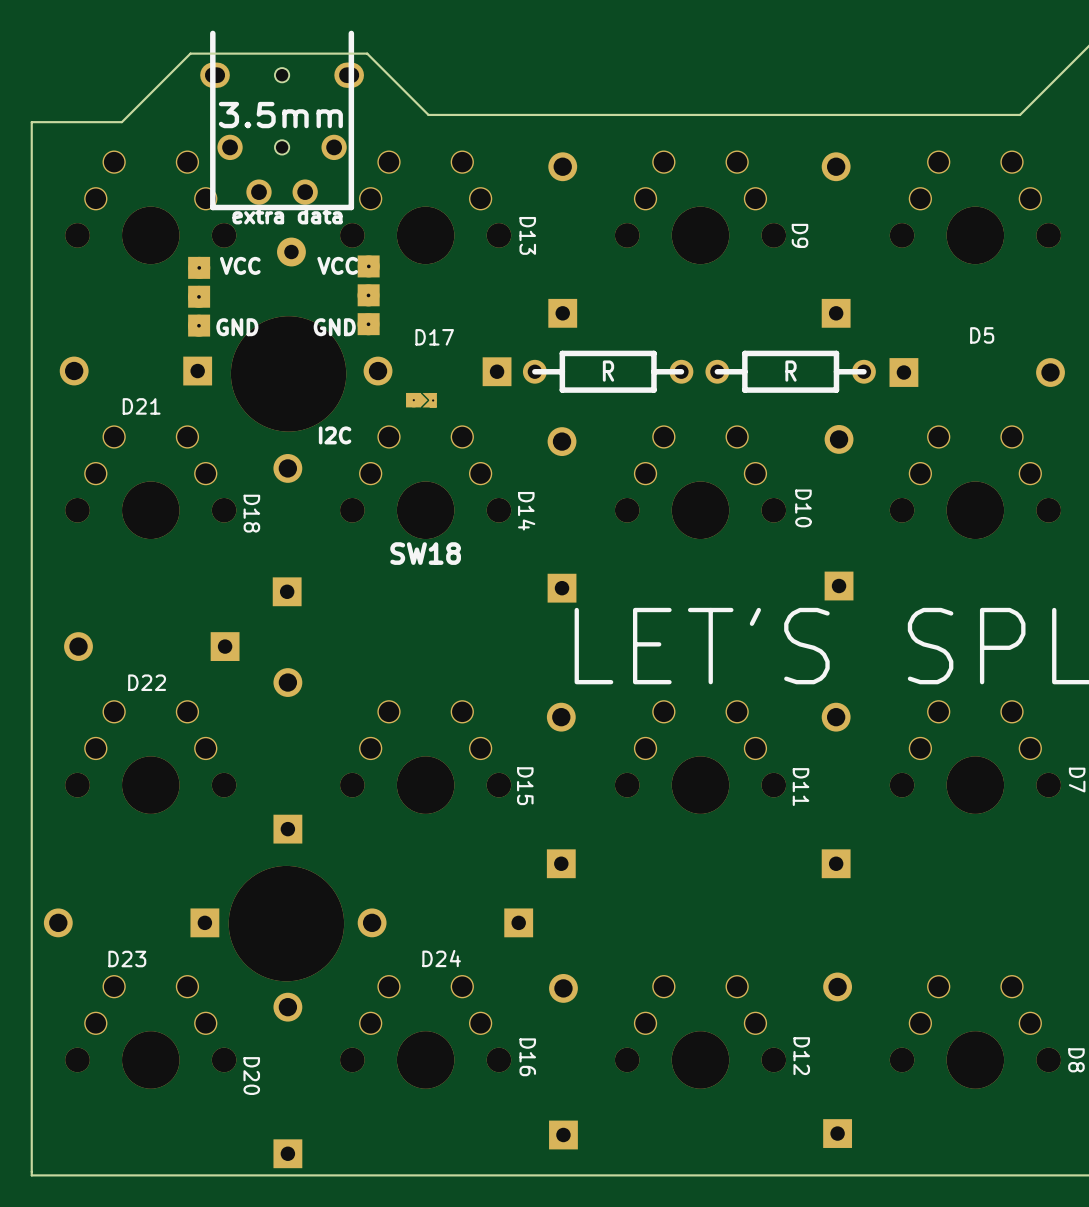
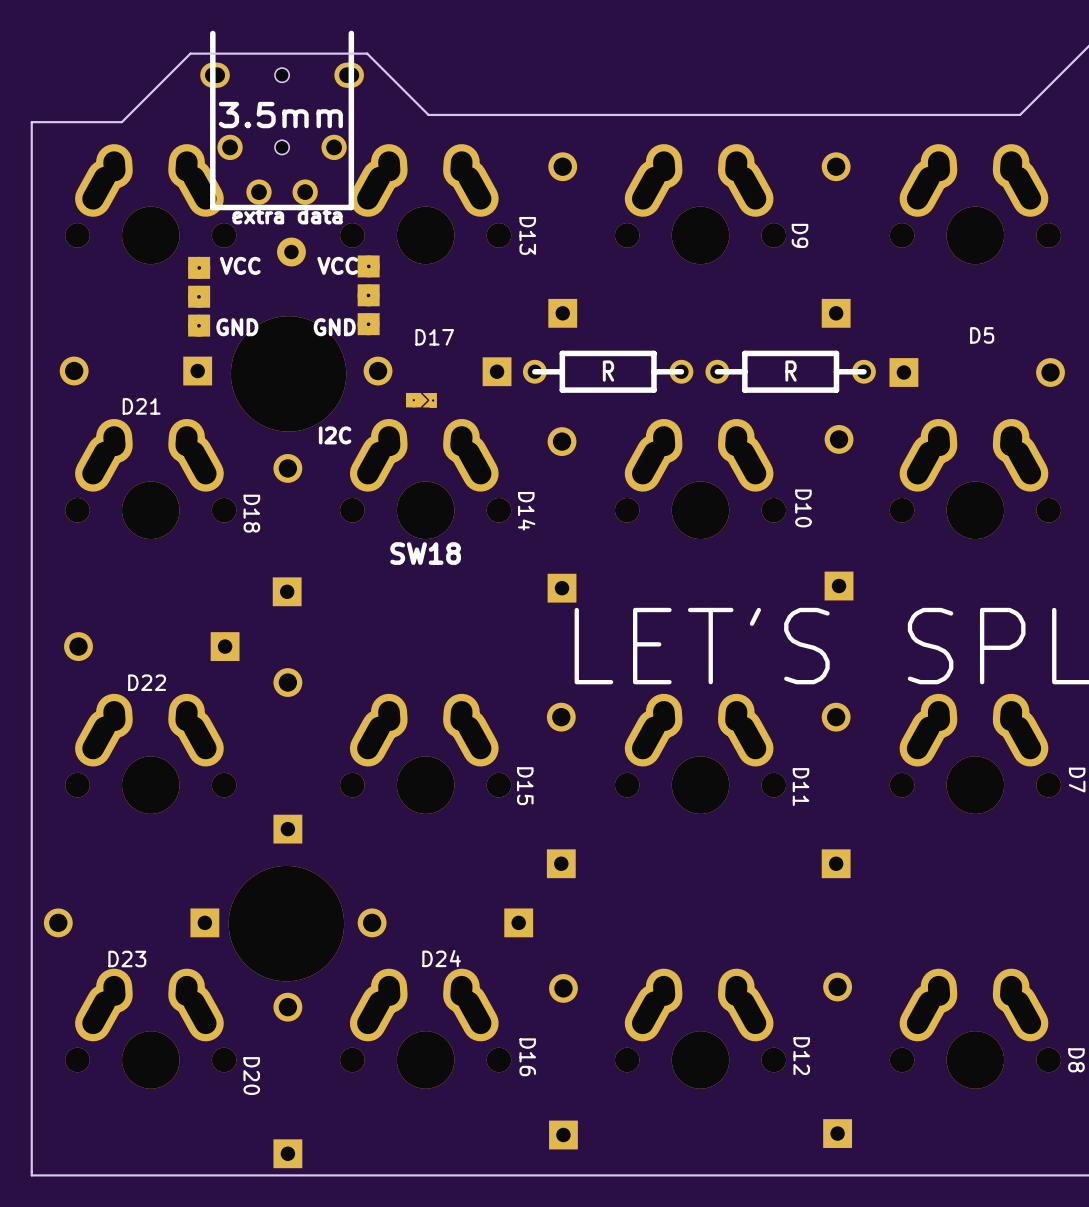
part footprint: [65, 150, 237, 265] -> [65, 144, 237, 265]
part footprint: [340, 150, 512, 265] -> [340, 144, 512, 265]
part footprint: [614, 150, 787, 265] -> [614, 144, 787, 265]
part footprint: [889, 150, 1061, 265] -> [889, 144, 1061, 265]
part footprint: [65, 425, 237, 540] -> [65, 418, 237, 540]
SW18 footprint: [340, 425, 512, 540] -> [340, 418, 512, 540]
part footprint: [614, 425, 787, 540] -> [614, 418, 787, 540]
part footprint: [889, 425, 1061, 540] -> [889, 418, 1061, 540]
part footprint: [65, 700, 237, 814] -> [65, 693, 237, 814]
part footprint: [340, 700, 512, 814] -> [340, 693, 512, 814]
part footprint: [614, 700, 787, 814] -> [614, 693, 787, 814]
part footprint: [889, 700, 1061, 814] -> [889, 693, 1061, 814]
part footprint: [65, 975, 237, 1089] -> [65, 968, 237, 1089]
part footprint: [340, 975, 512, 1089] -> [340, 968, 512, 1089]
part footprint: [614, 975, 787, 1089] -> [614, 968, 787, 1089]
part footprint: [889, 975, 1061, 1089] -> [889, 968, 1061, 1089]

